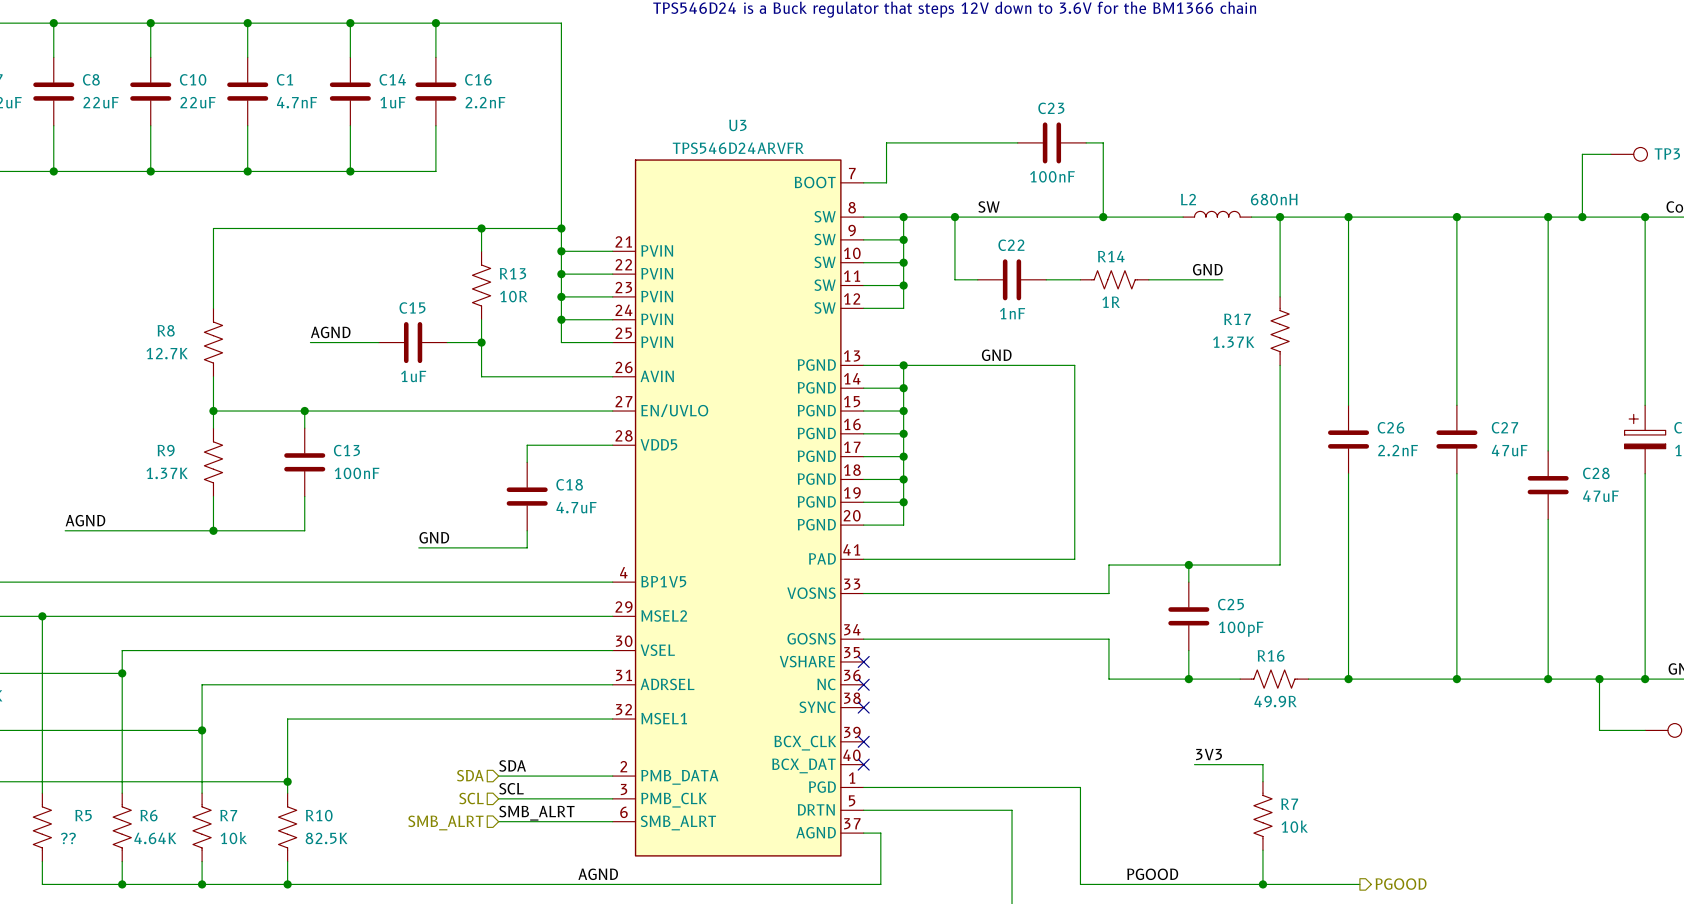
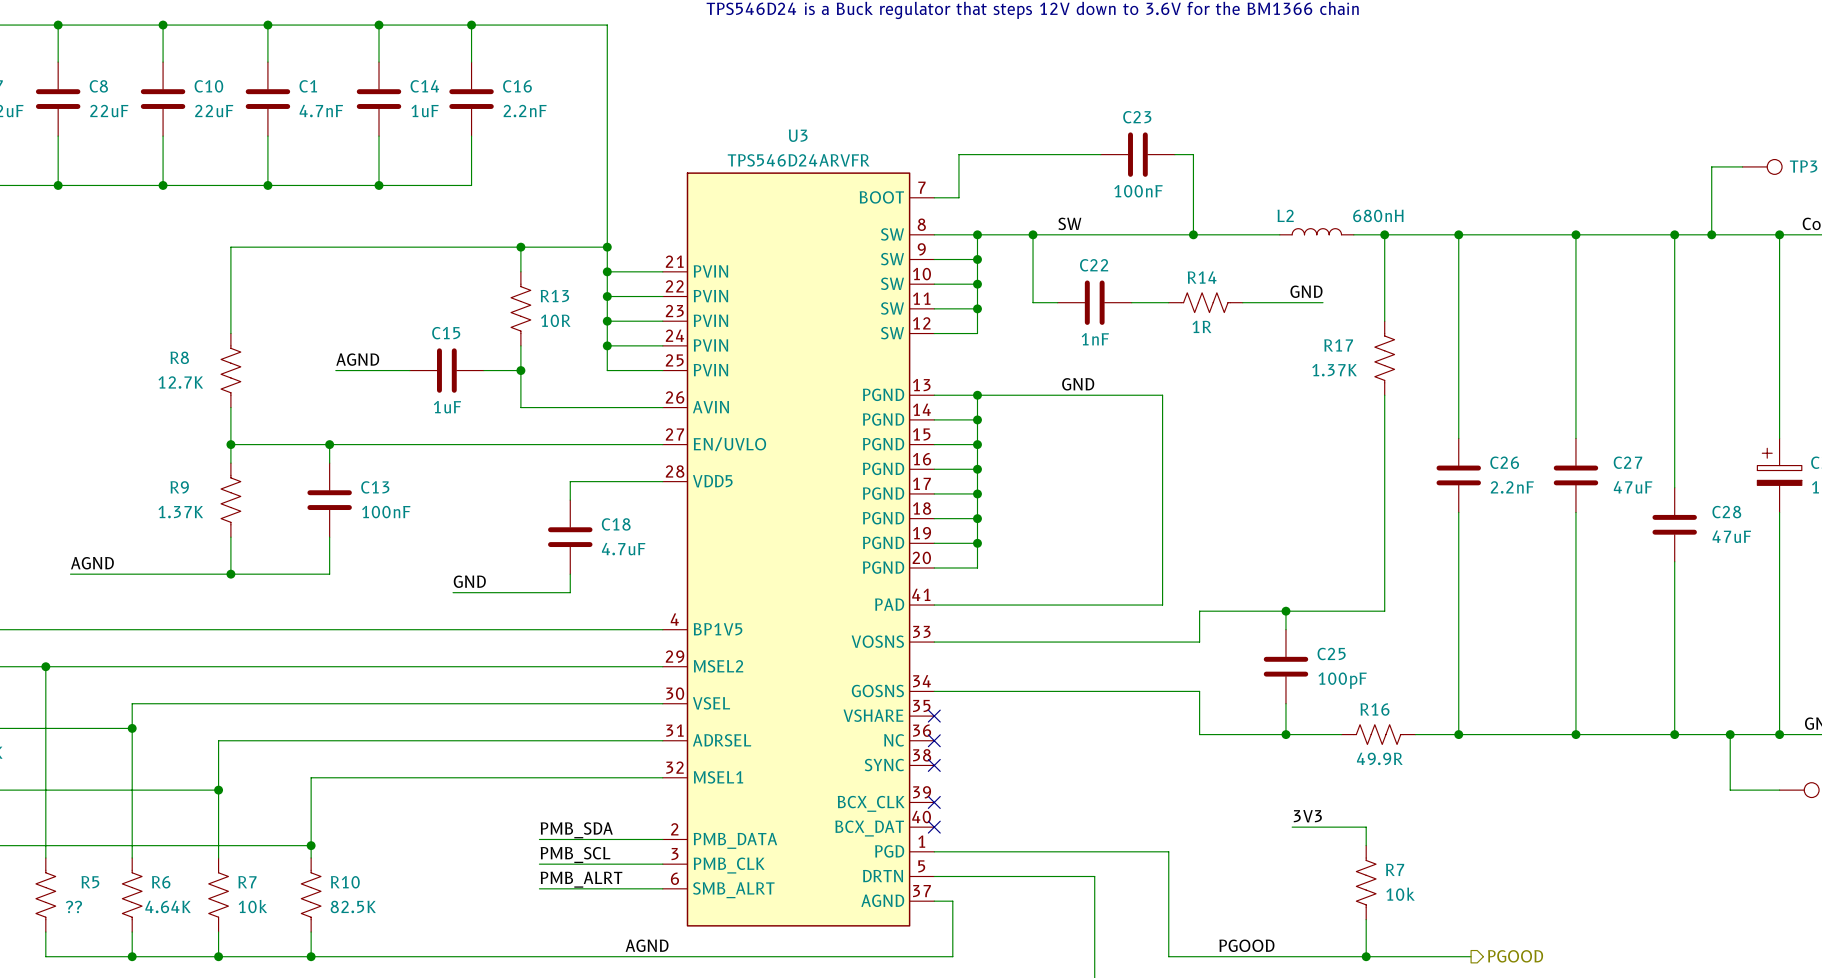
label: SDA (512, 765) -> PMB_SDA (576, 830)
hierarchical label: SDA (470, 775) -> none
label: SCL (511, 788) -> PMB_SCL (575, 854)
hierarchical label: SCL (471, 798) -> none
label: SMB_ALRT (536, 813) -> PMB_ALRT (581, 879)
hierarchical label: SMB_ALRT (445, 822) -> none

